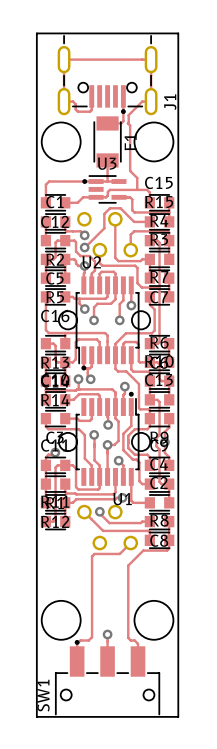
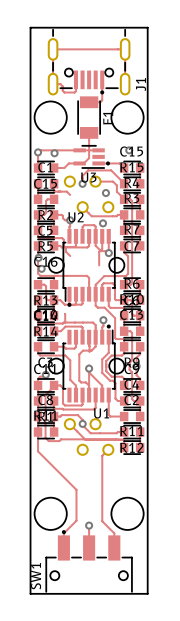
track: (151, 101) (142, 101) (128, 115) (130, 170) (137, 178) (137, 189) -> none
via: none -> (129, 150)
via: none -> (38, 152)
via: none -> (54, 153)
U3 rotation: 0° (104, 189) -> 180° (91, 156)
track: (101, 197) (106, 197) (109, 189) (147, 189) (149, 192) (149, 202) -> (83, 163) (89, 158) (89, 150)
track: (130, 197) (134, 212) (169, 212) -> (107, 163) (119, 163) (124, 167)
track: (115, 219) (115, 257) (118, 261) -> (82, 207) (91, 216) (98, 216)
track: none -> (95, 181) (113, 181) (116, 185) (116, 191) (124, 199)
C12 name: C12 (54, 221) -> C15 (45, 183)
via: none -> (82, 183)
track: (149, 221) (134, 221) (120, 208) (110, 208) (104, 213) (104, 228) (84, 247) -> (124, 183) (111, 170) (88, 170) (82, 176) (82, 183)
via: none -> (105, 193)
via: (84, 235) -> none
track: (65, 240) (74, 240) (76, 251) (80, 256) (89, 256) (94, 261) (94, 270) (91, 273) (91, 285) -> (38, 230) (38, 237) (62, 238) (65, 246) (74, 246) (76, 236)
track: (169, 240) (167, 231) (134, 231) (130, 234) (130, 250) -> none
via: (84, 247) -> none
track: (99, 250) (99, 263) (102, 265) (135, 265) (137, 268) (137, 283) (141, 287) (159, 287) -> none
via: none -> (103, 223)
track: (115, 296) (111, 303) (97, 303) (94, 307) (94, 320) -> (95, 245) (100, 251) (107, 251)
via: (84, 309) -> none
via: none -> (38, 257)
via: (94, 320) -> none
via: (119, 320) -> none
via: none -> (41, 268)
track: (99, 355) (99, 342) (96, 339) (78, 339) (75, 342) (75, 359) (72, 362) -> (82, 294) (81, 304) (64, 304) (60, 300)
track: (87, 368) (87, 376) (90, 379) -> none
via: (78, 379) -> none
via: (90, 379) -> none
track: (115, 418) (118, 421) (118, 440) (114, 444) (107, 444) -> (95, 346) (91, 350) (82, 350) (79, 354) (79, 380) (89, 385)
via: (108, 424) -> none
track: (94, 434) (94, 460) (99, 465) (99, 476) -> none
via: (94, 434) -> none
via: (118, 460) -> none
track: none -> (54, 383) (54, 386) (45, 395) (45, 437) (48, 441) (59, 441) (61, 439) (123, 439) (116, 439)
track: (65, 465) (57, 465) (55, 467) (55, 519) (53, 521) (45, 521) -> none
track: (122, 497) (76, 499) (74, 501) -> (82, 423) (82, 419) (77, 415) (61, 415)
via: (122, 497) -> none
R8 name: R8 (159, 520) -> R11 (131, 431)
R12 name: R12 (55, 521) -> C8 (45, 400)
C8 name: C8 (159, 540) -> R12 (131, 447)
track: (169, 540) (169, 548) (167, 550) (143, 550) (128, 565) (128, 637) (134, 640) -> (102, 455) (102, 521) (111, 530)
track: (123, 550) (119, 553) (94, 553) (92, 556) (92, 637) (88, 640) (80, 640) -> (38, 416) (38, 451) (76, 489) (76, 520) (66, 530)

